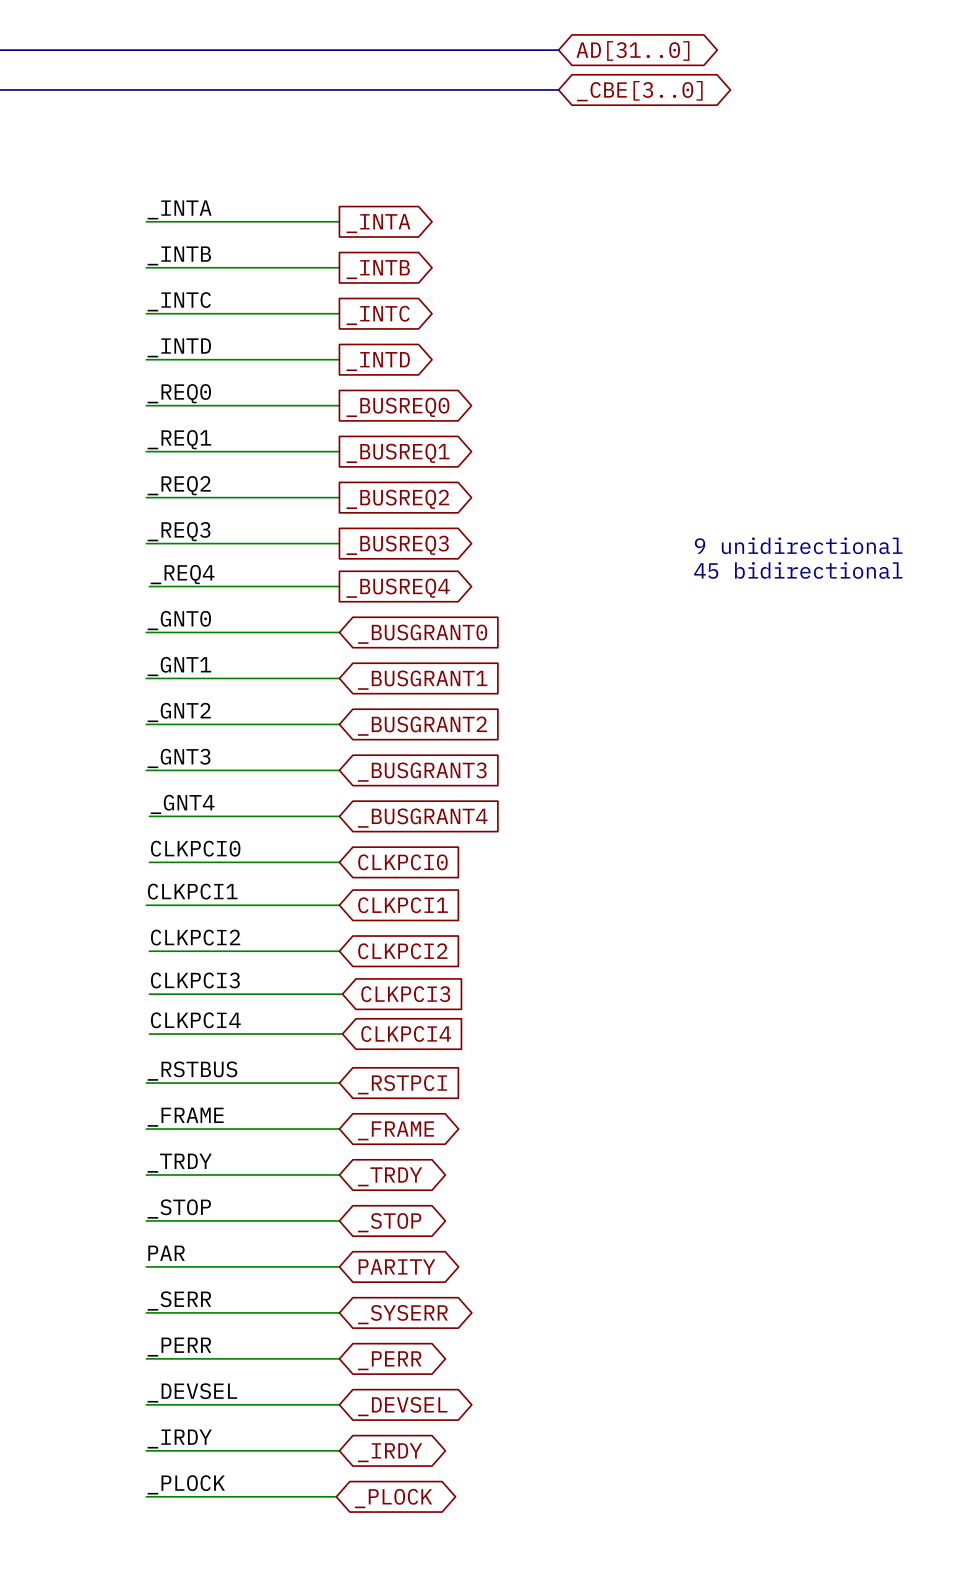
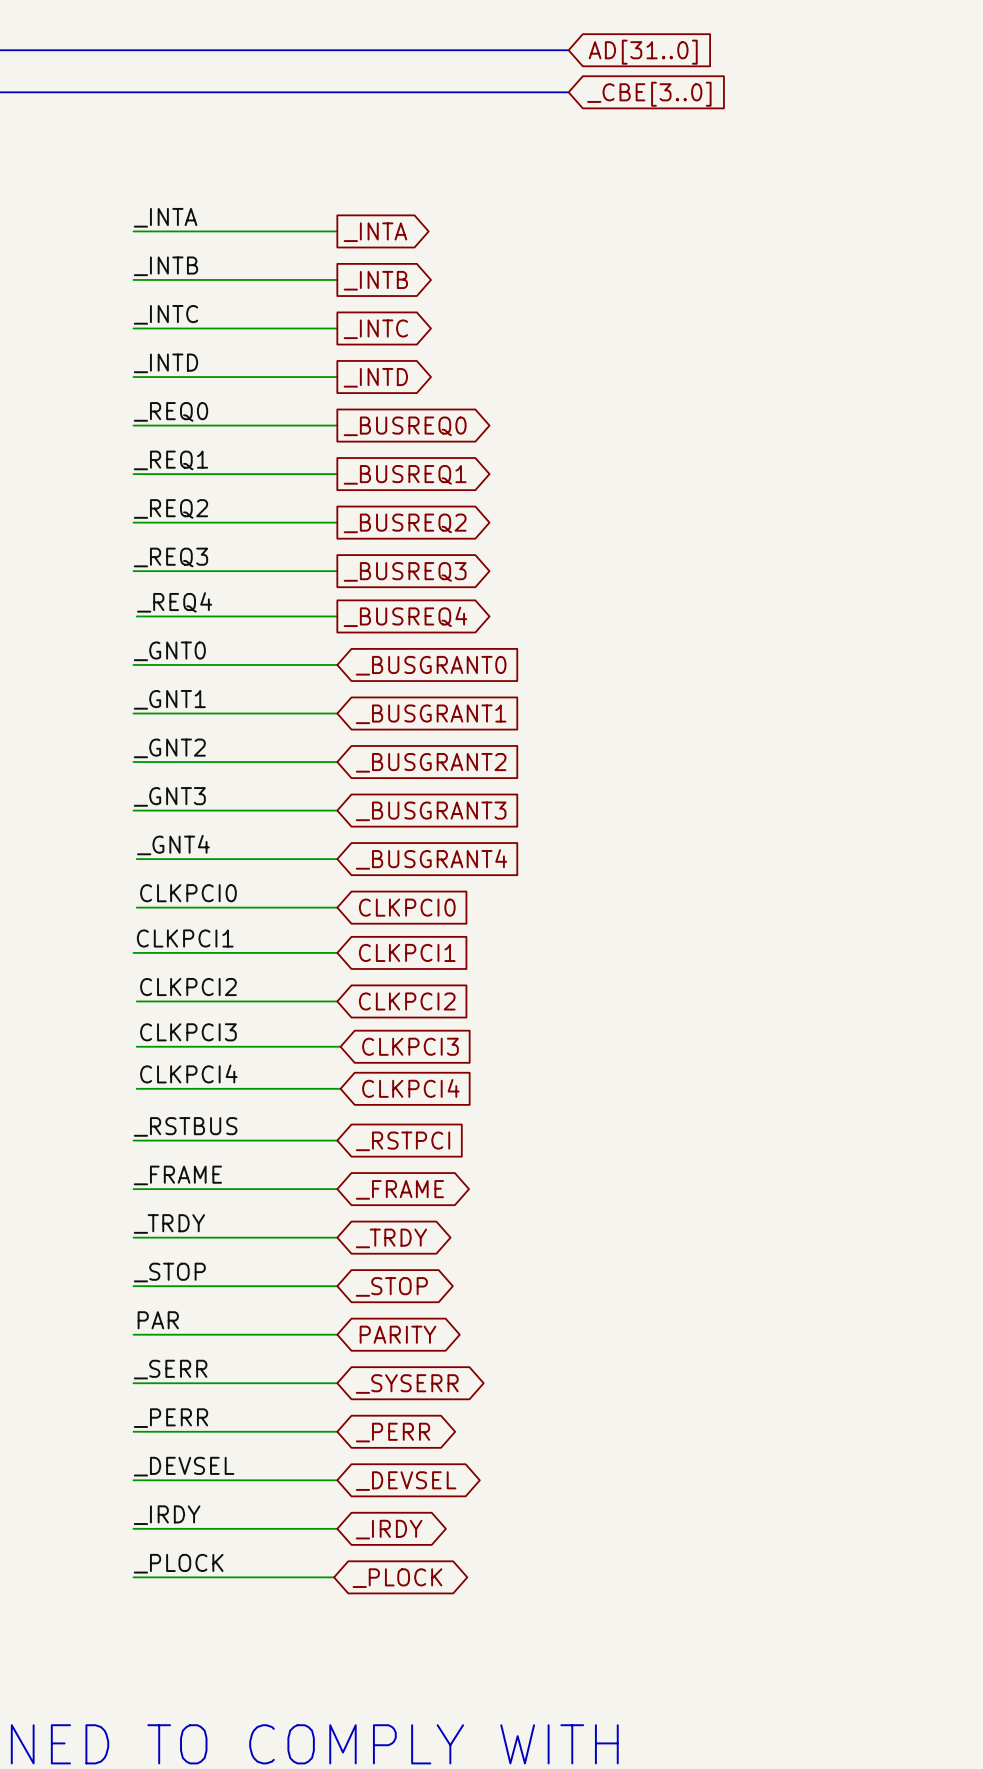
global label shape: bidirectional (632, 50) -> input (643, 52)
global label shape: bidirectional (639, 91) -> input (649, 94)
text: 9 unidirectional (798, 545) -> none
text: 45 bidirectional (798, 570) -> none

